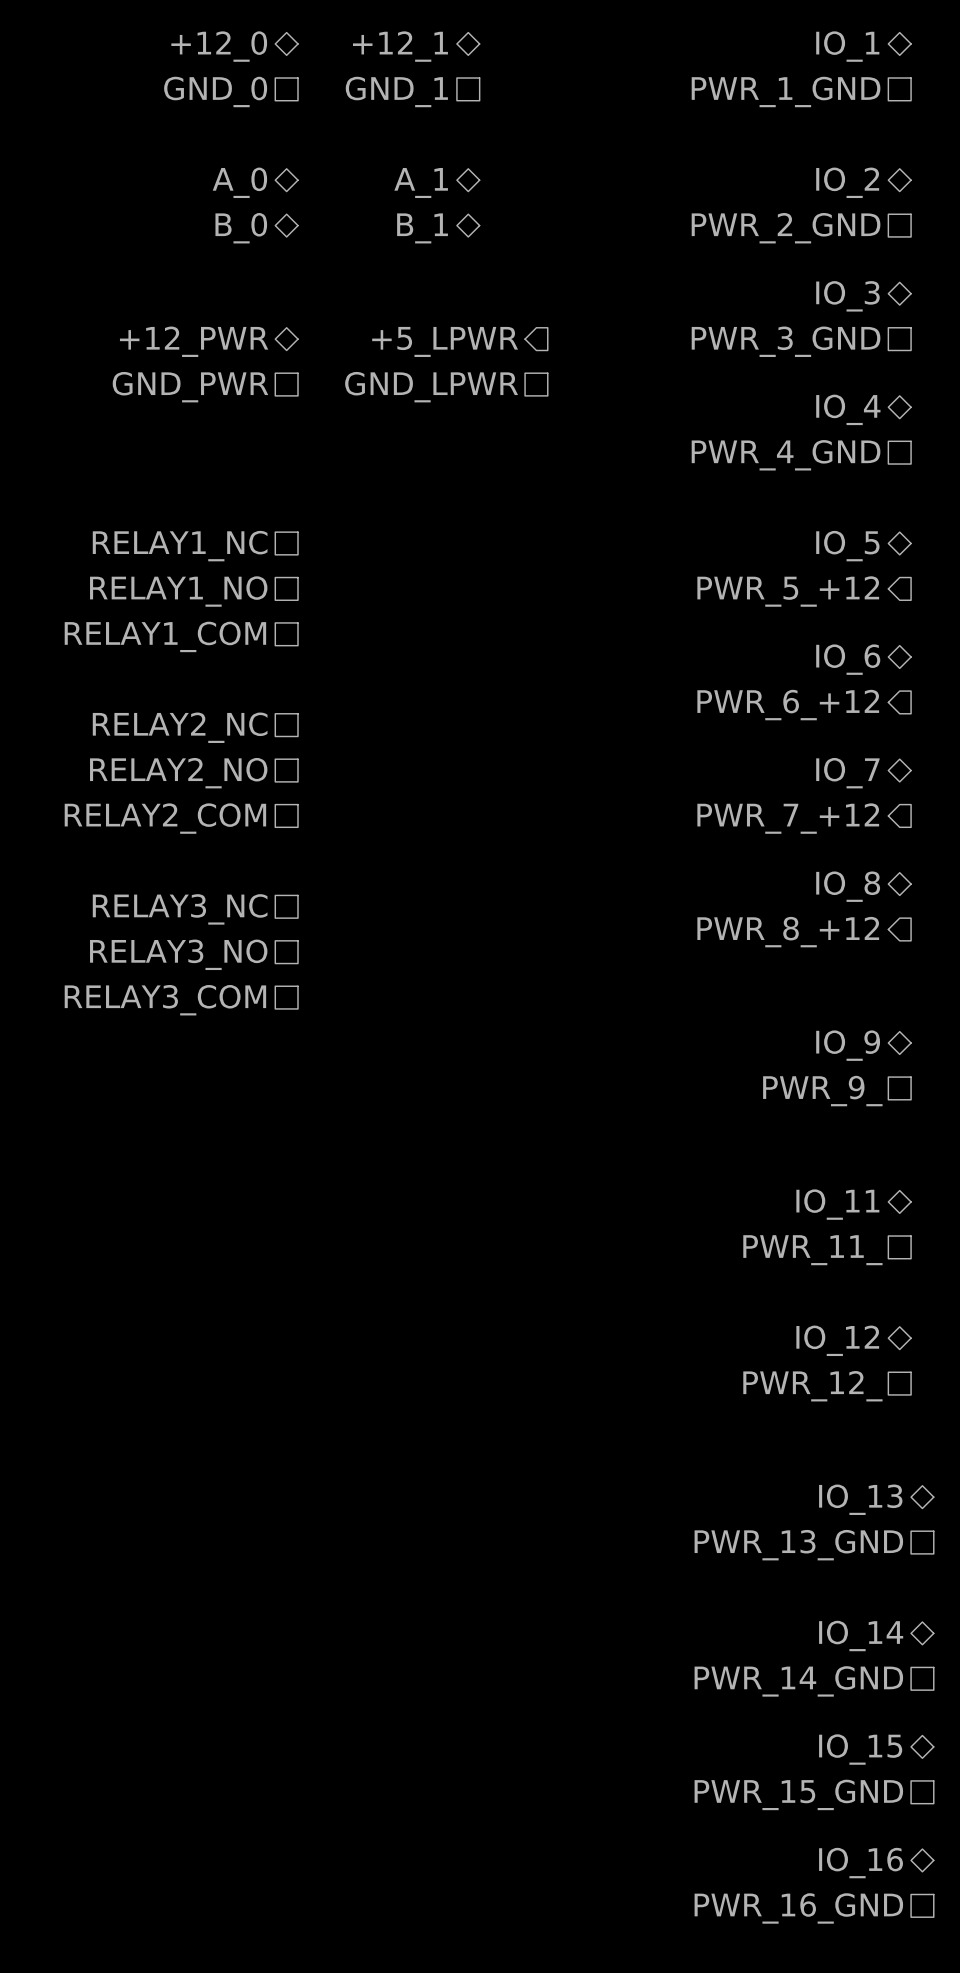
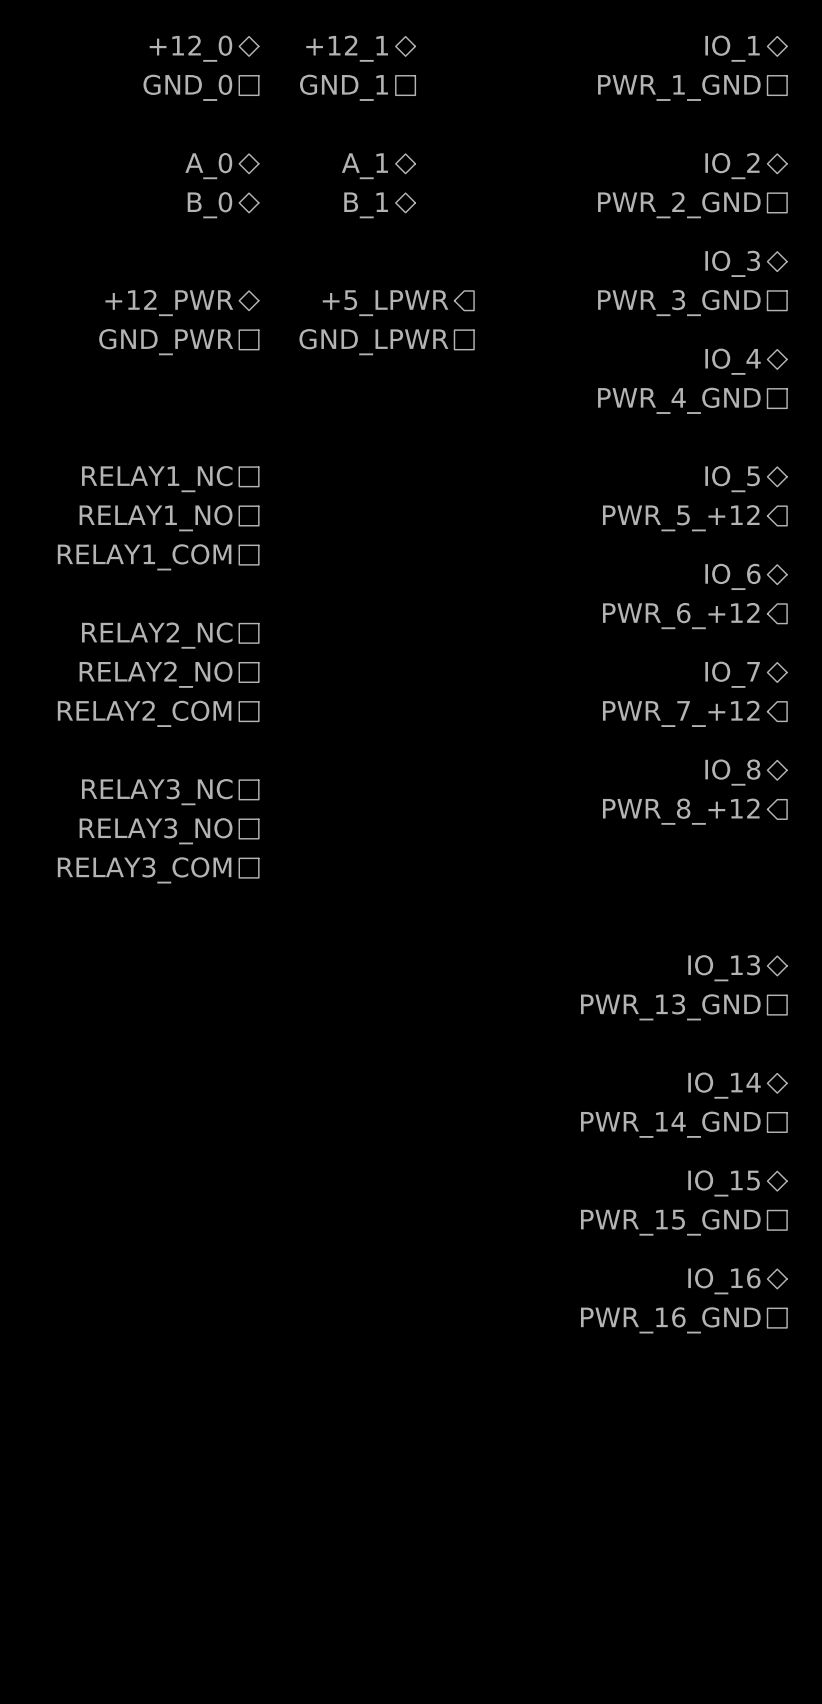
hierarchical label: IO_9 (848, 1045) -> none
hierarchical label: PWR_9_ (822, 1091) -> none
hierarchical label: IO_11 (837, 1204) -> none
hierarchical label shape: passive (812, 1250) -> bidirectional (724, 1085)
hierarchical label: PWR_11_ (812, 1250) -> IO_14 (724, 1085)
hierarchical label: IO_12 (837, 1340) -> none
hierarchical label: PWR_12_ (812, 1386) -> none
hierarchical label position: IO_13 (860, 1499) -> IO_13 (724, 968)
hierarchical label position: PWR_13_GND (798, 1545) -> PWR_13_GND (670, 1007)
hierarchical label: IO_14 (861, 1635) -> none
hierarchical label position: PWR_14_GND (798, 1681) -> PWR_14_GND (670, 1124)
hierarchical label position: IO_15 (860, 1749) -> IO_15 (724, 1183)
hierarchical label position: PWR_15_GND (798, 1794) -> PWR_15_GND (670, 1222)
hierarchical label position: IO_16 (861, 1863) -> IO_16 (724, 1281)
hierarchical label position: PWR_16_GND (798, 1908) -> PWR_16_GND (670, 1320)

